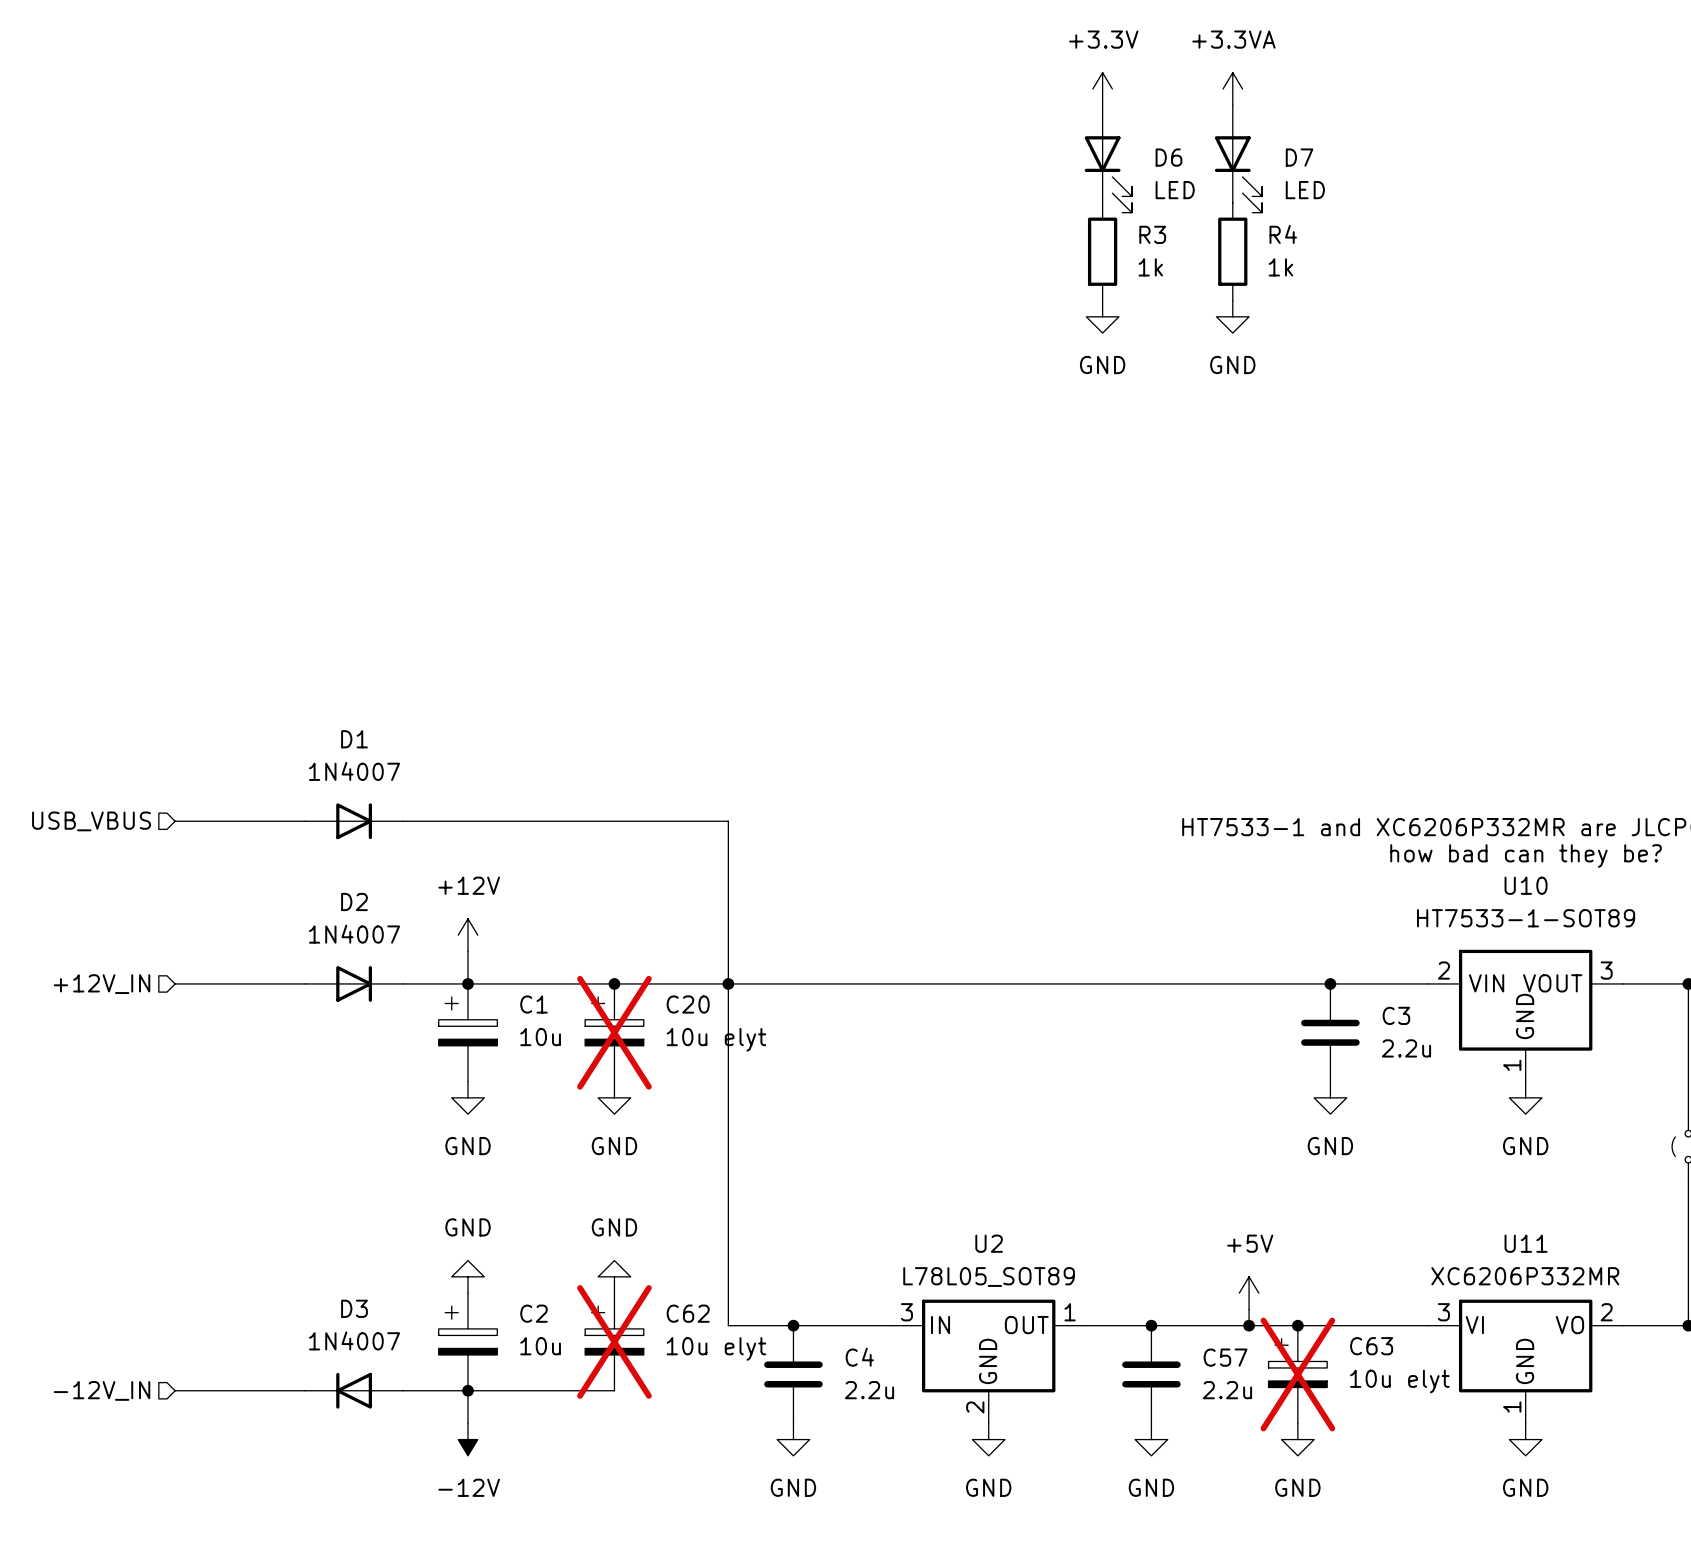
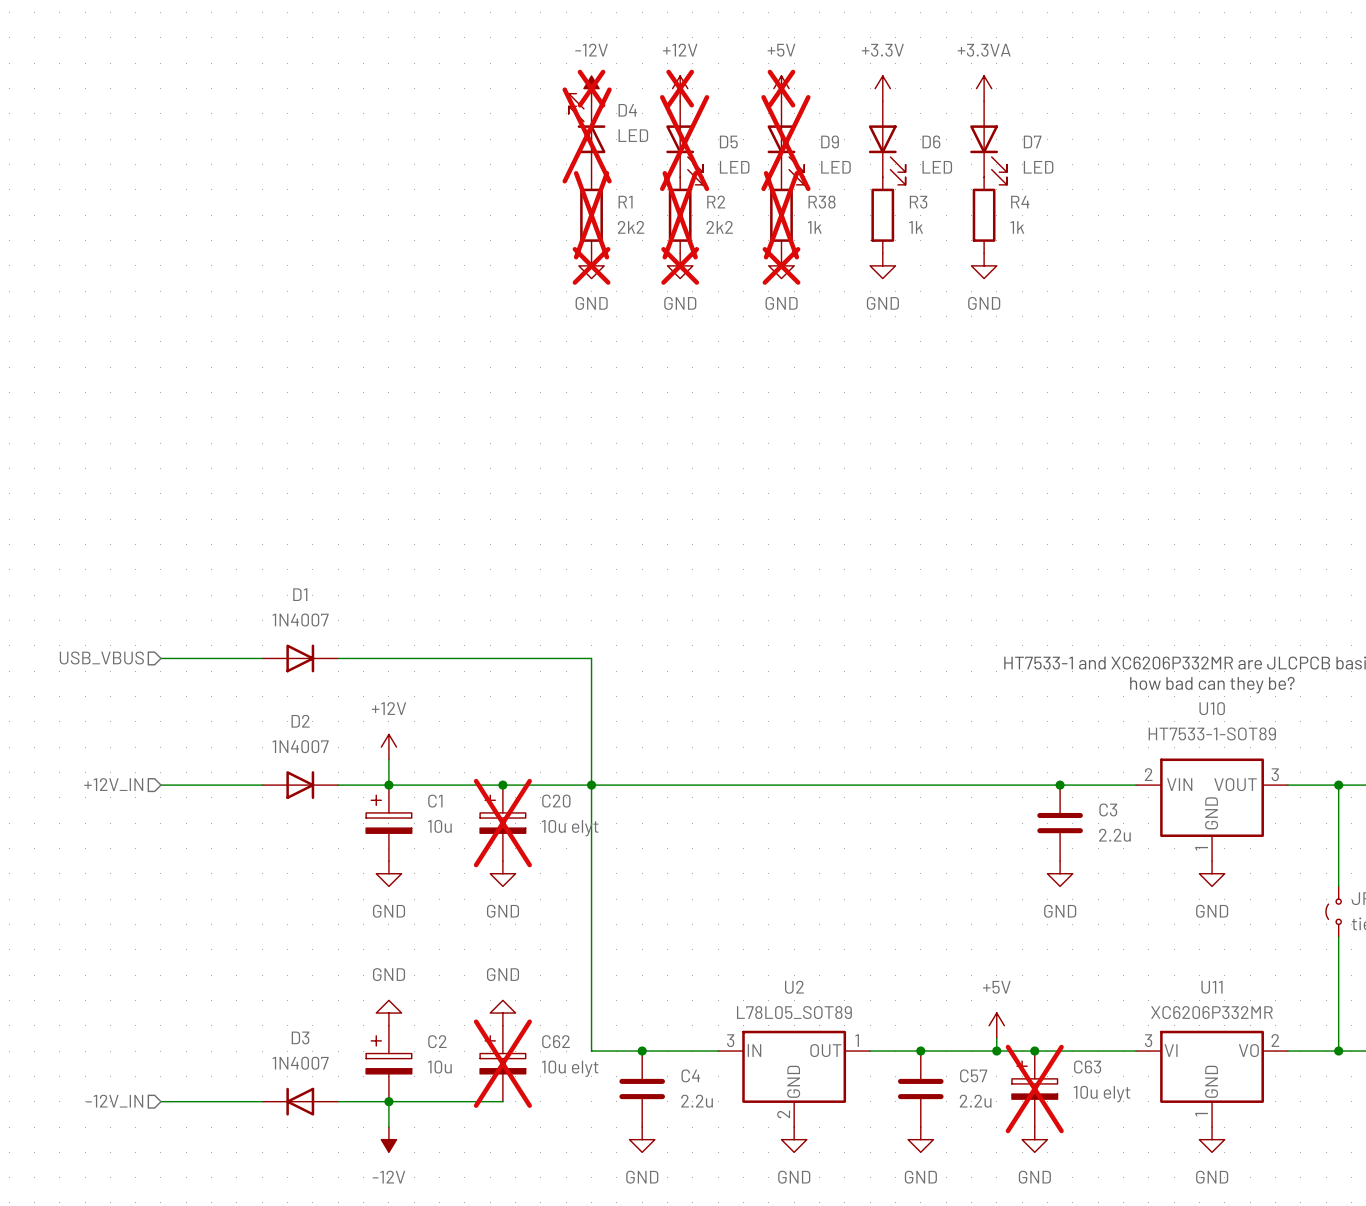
power symbol: none -> -12V (591, 88)
power symbol: none -> +12V (680, 88)
power symbol: none -> +5V (781, 88)
D4: none -> LED (587, 135)
D5: none -> LED (684, 143)
D9: none -> LED (785, 143)
R1: none -> 2k2 (591, 215)
R2: none -> 2k2 (680, 215)
R38: none -> 1k (781, 215)
power symbol: none -> GND (591, 265)
power symbol: none -> GND (680, 265)
power symbol: none -> GND (781, 265)

